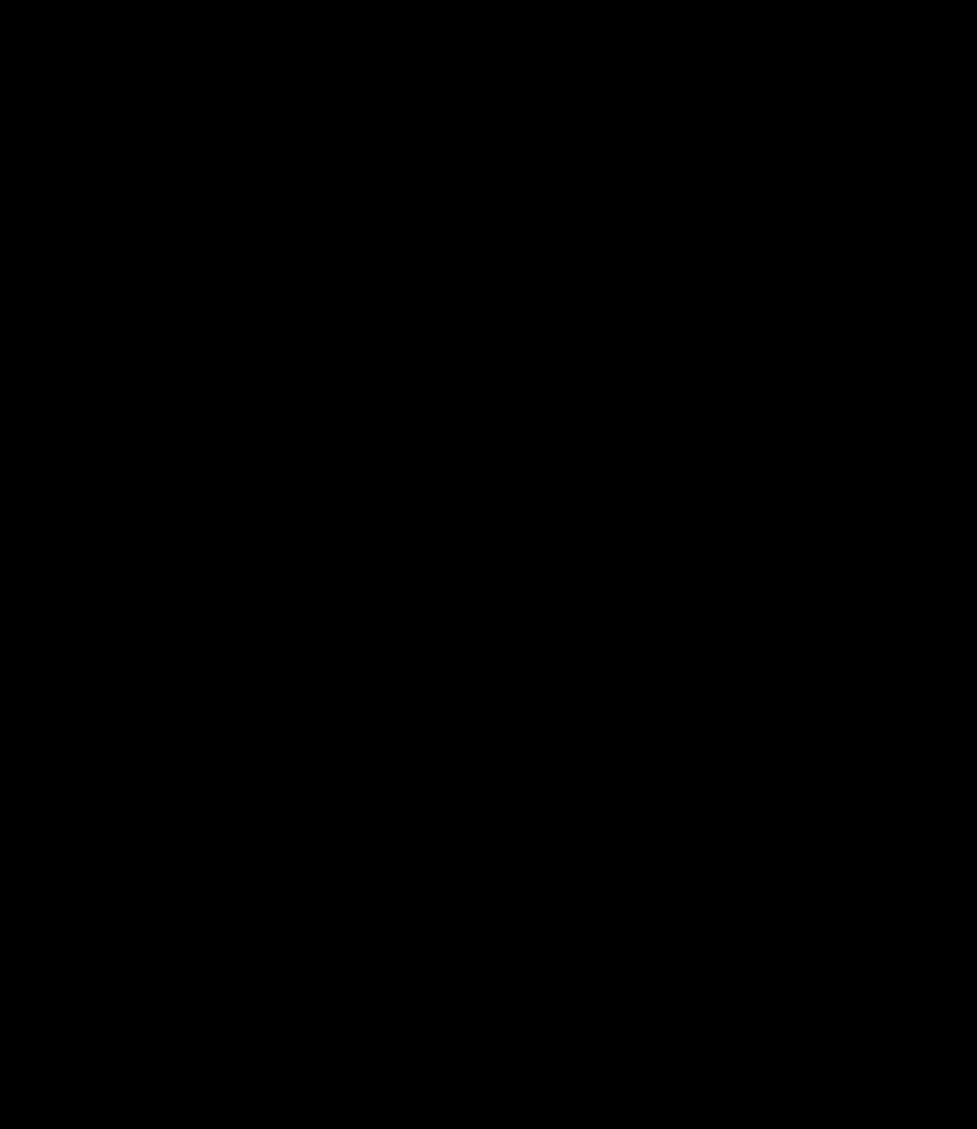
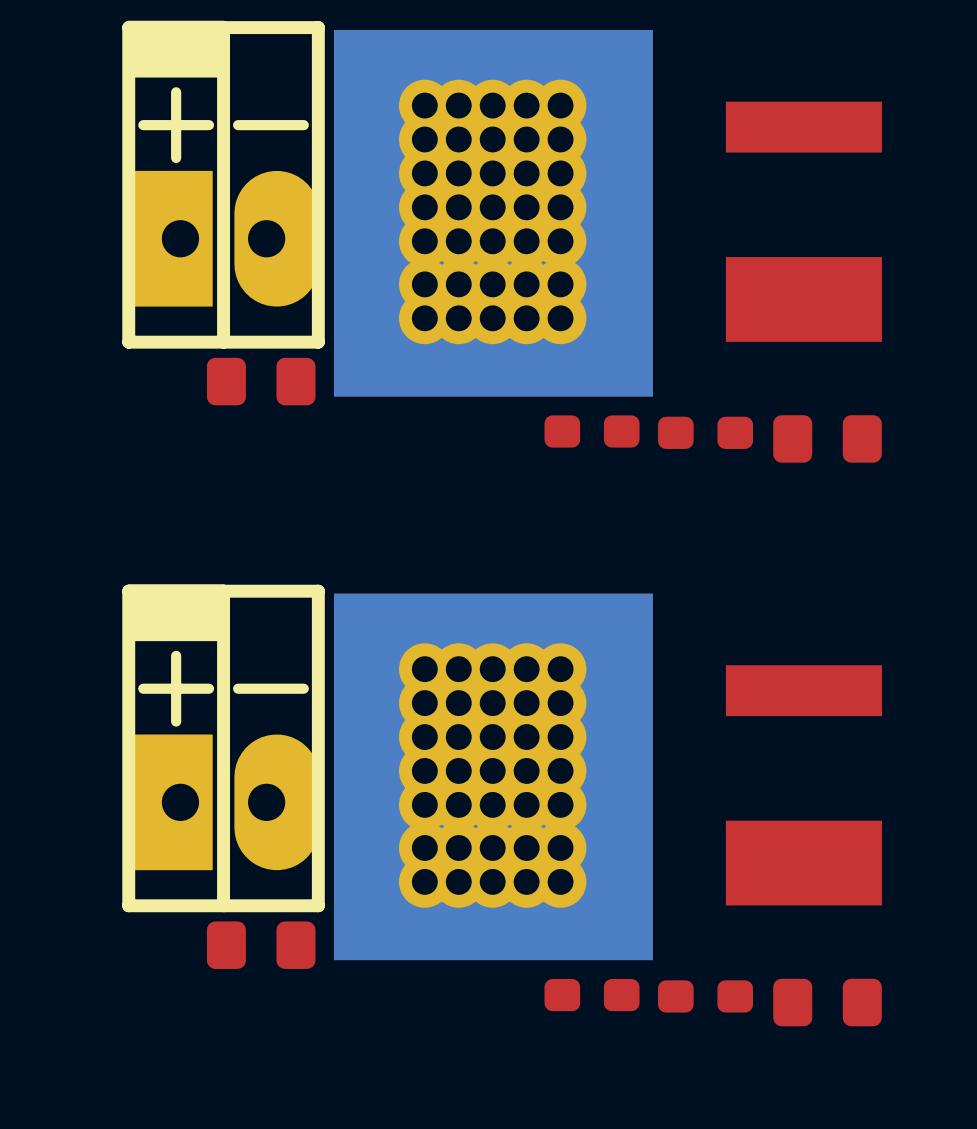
part: none -> (223, 184)
part: none -> (607, 213)
part: none -> (261, 381)
part: none -> (592, 431)
part: none -> (705, 432)
part: none -> (827, 438)
part: none -> (223, 748)
part: none -> (607, 776)
part: none -> (261, 945)
part: none -> (592, 995)
part: none -> (705, 996)
part: none -> (827, 1002)

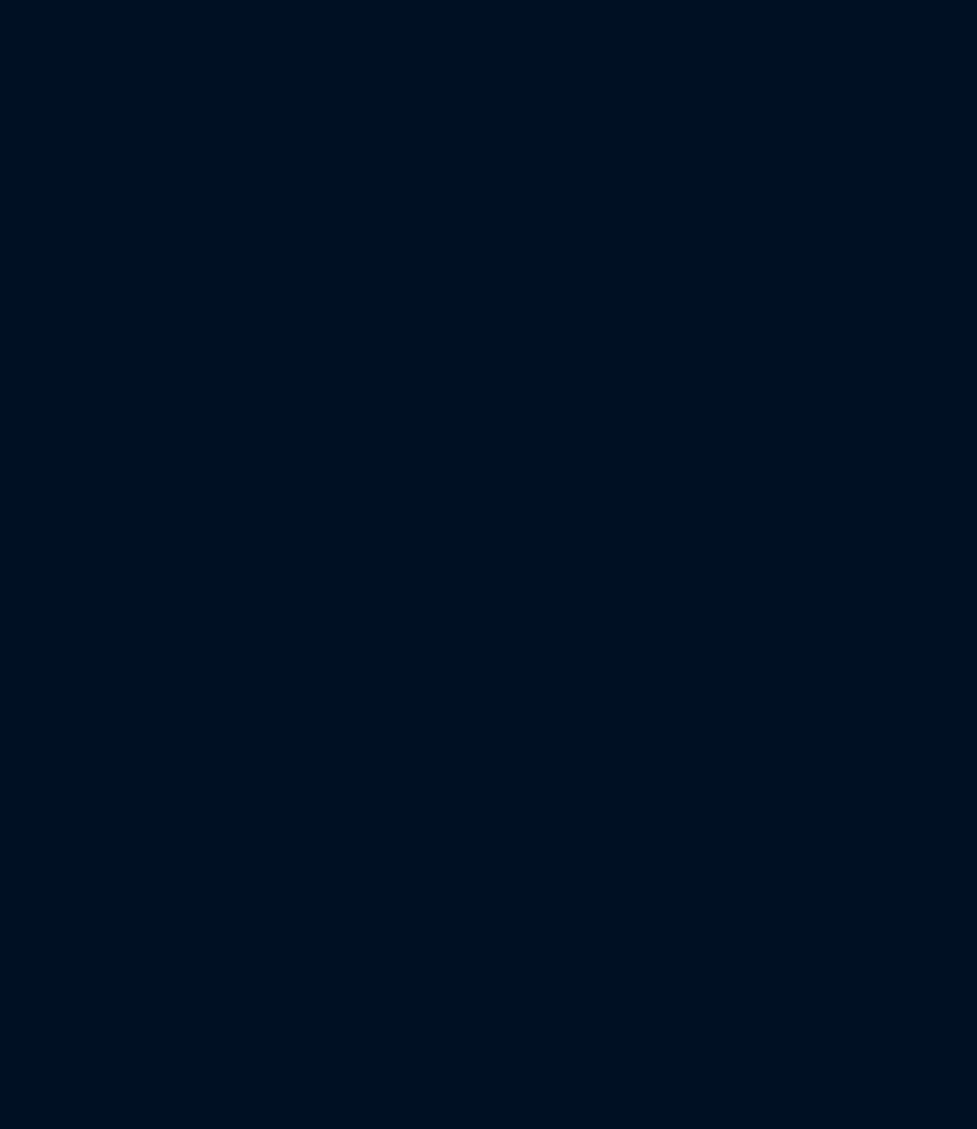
part: (223, 184) -> none
part: (607, 213) -> none
part: (261, 381) -> none
part: (592, 431) -> none
part: (705, 432) -> none
part: (827, 438) -> none
part: (223, 748) -> none
part: (607, 776) -> none
part: (261, 945) -> none
part: (592, 995) -> none
part: (705, 996) -> none
part: (827, 1002) -> none

